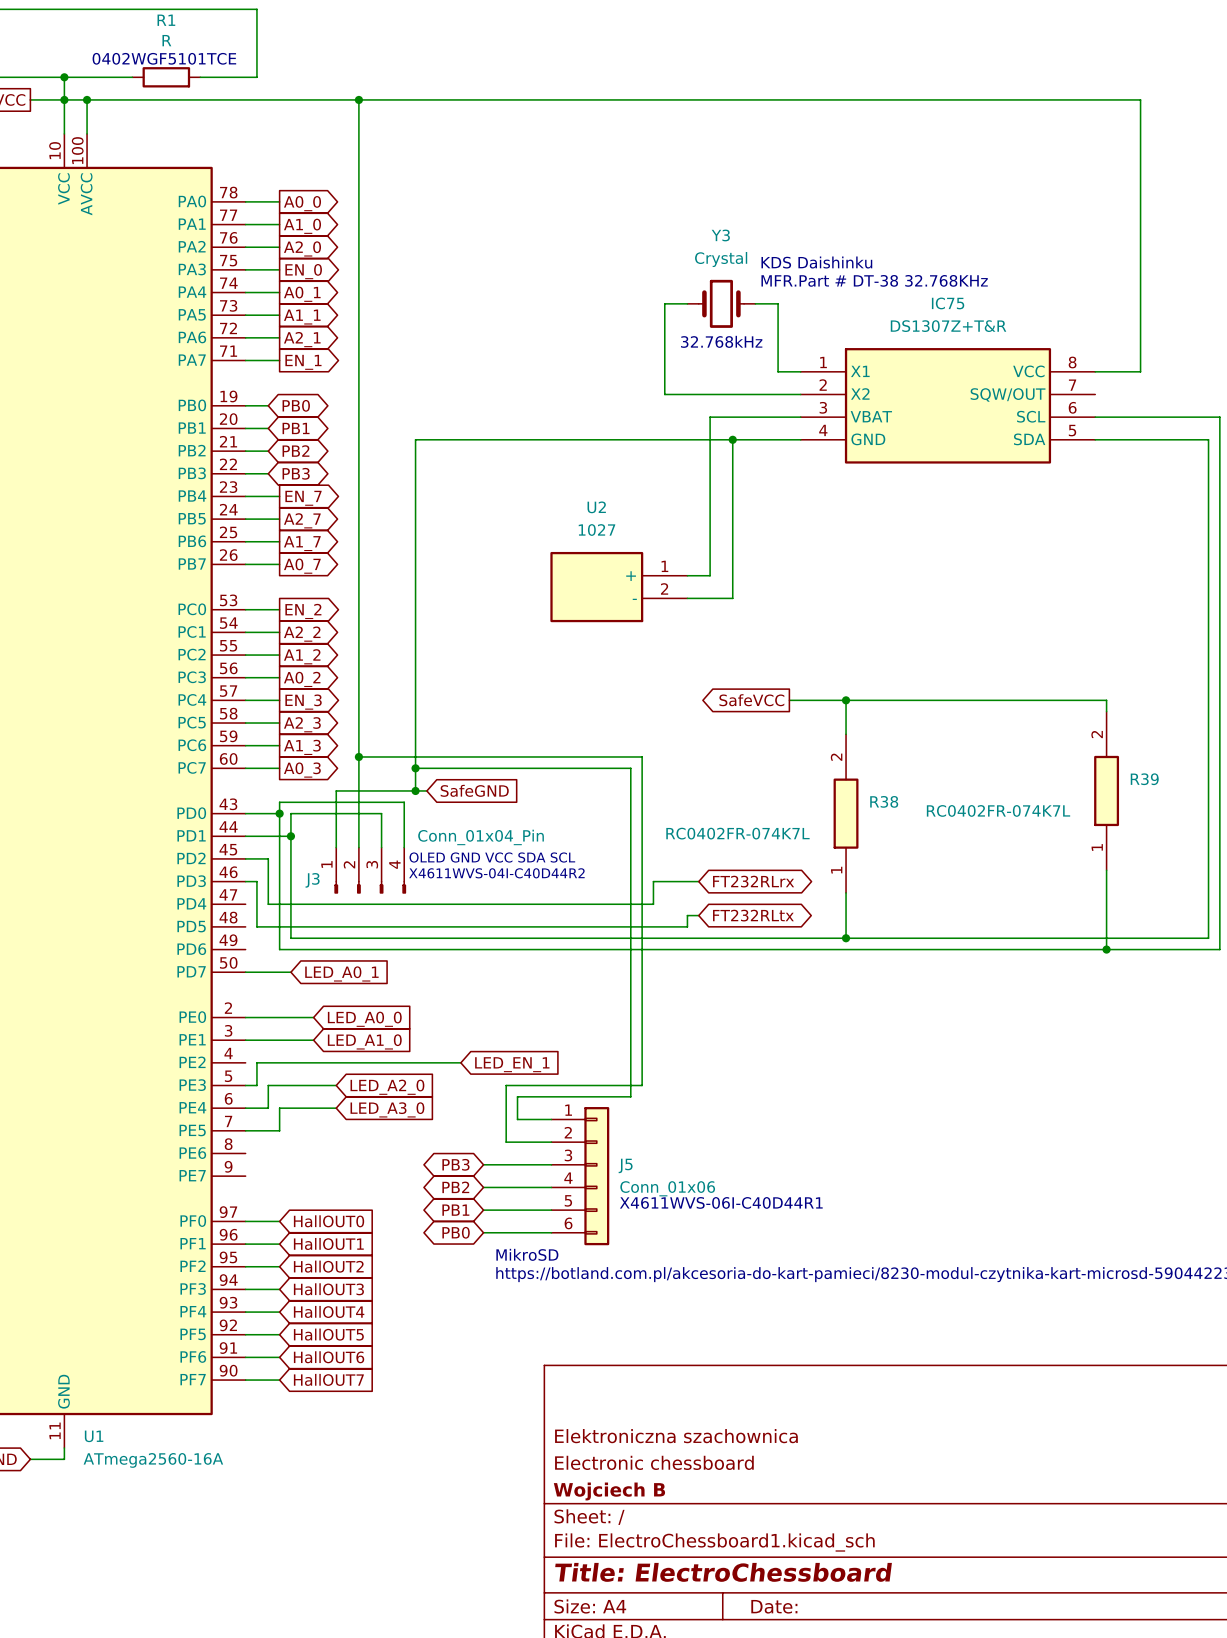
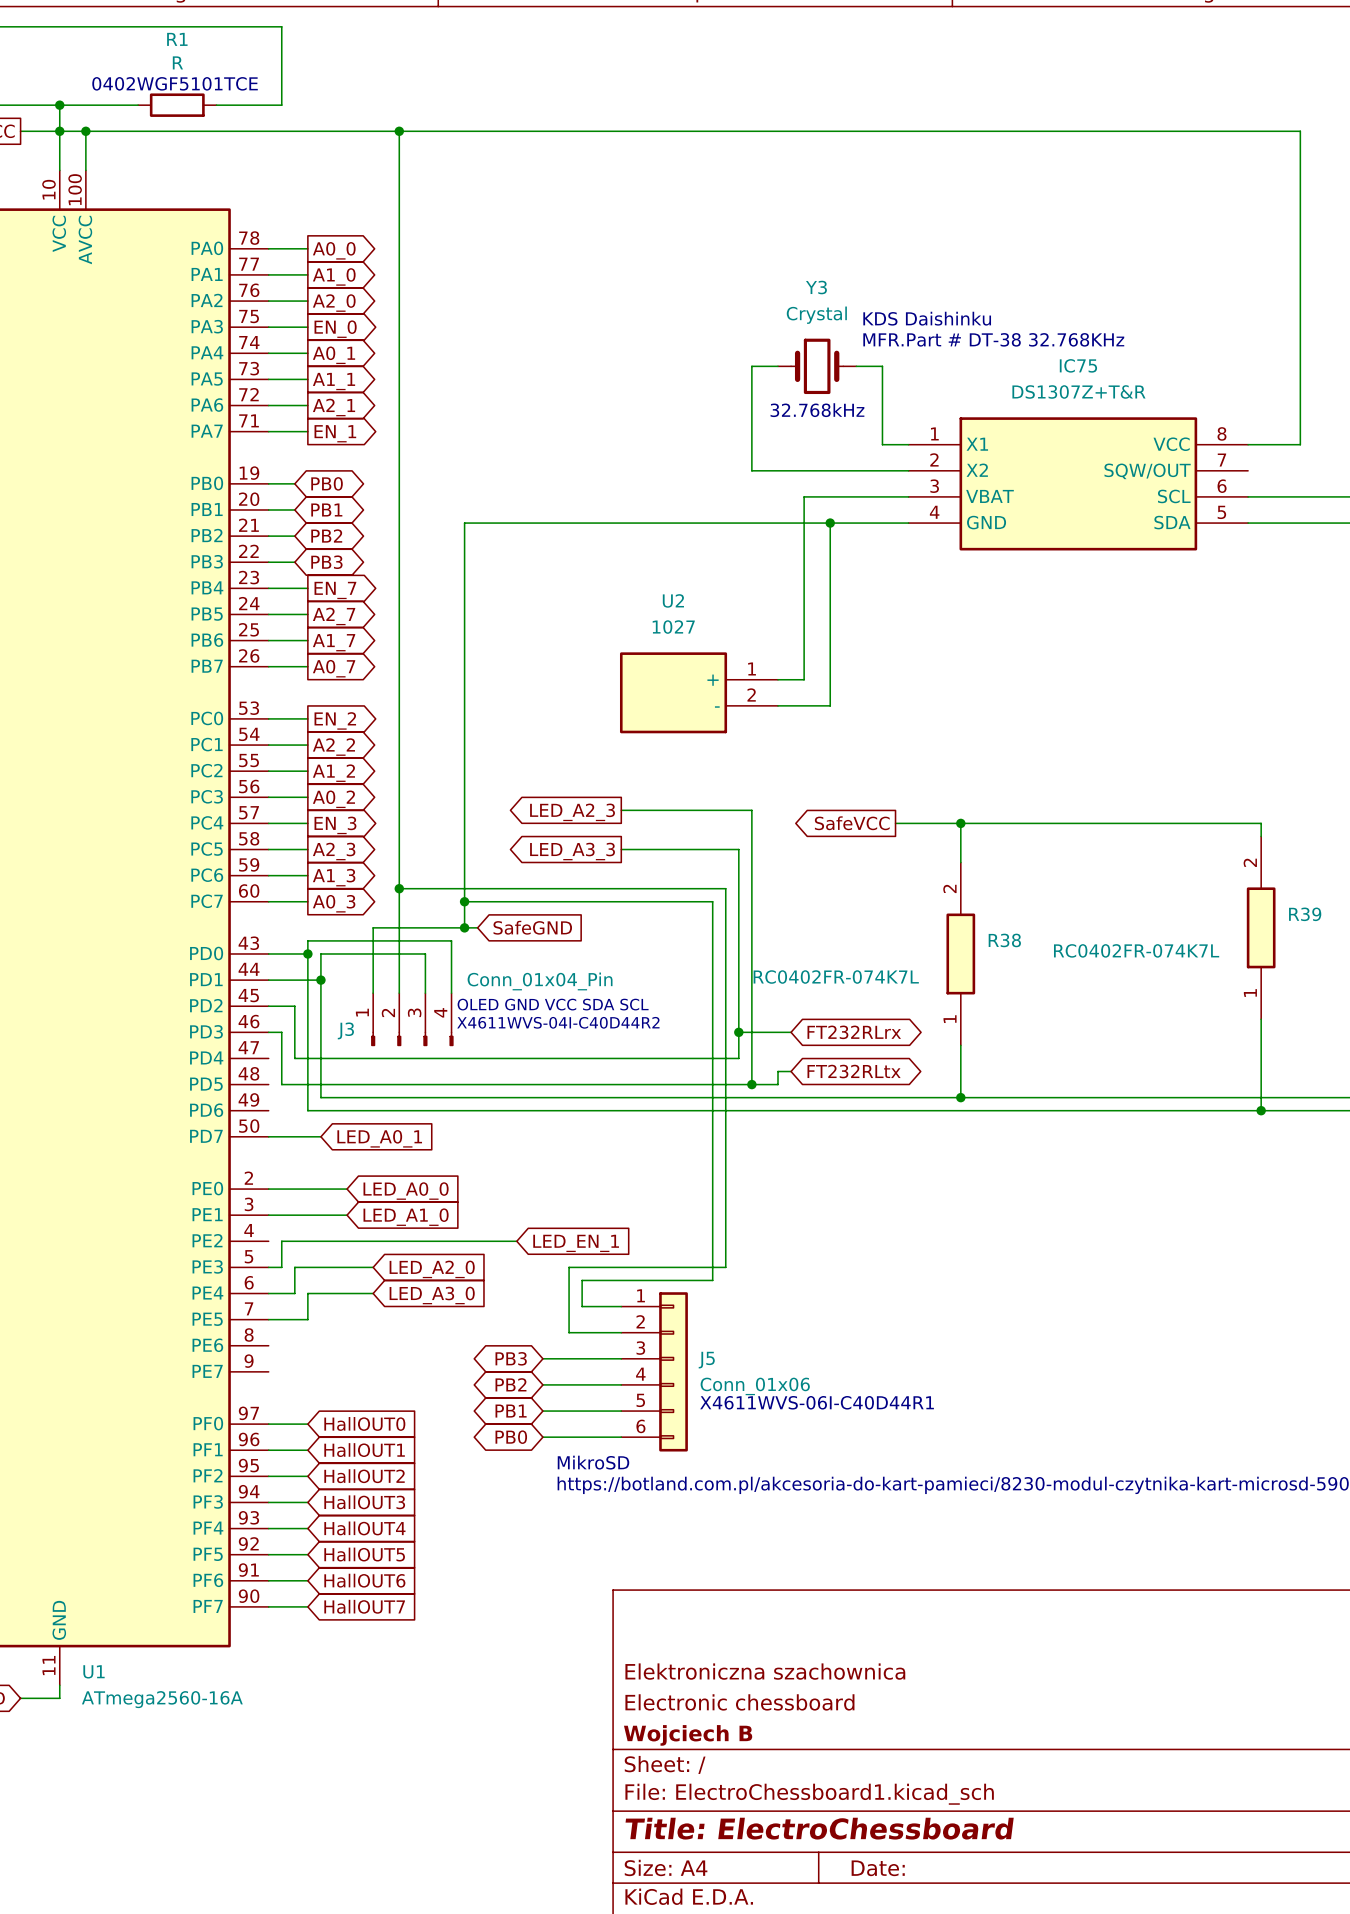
wire: none -> (621, 810) (751, 810) (751, 1084)
global label: none -> LED_A2_3 (572, 812)
wire: none -> (621, 849) (738, 849) (738, 1032)
global label: none -> LED_A3_3 (572, 851)
junction: none -> (738, 1032)
junction: none -> (751, 1084)

